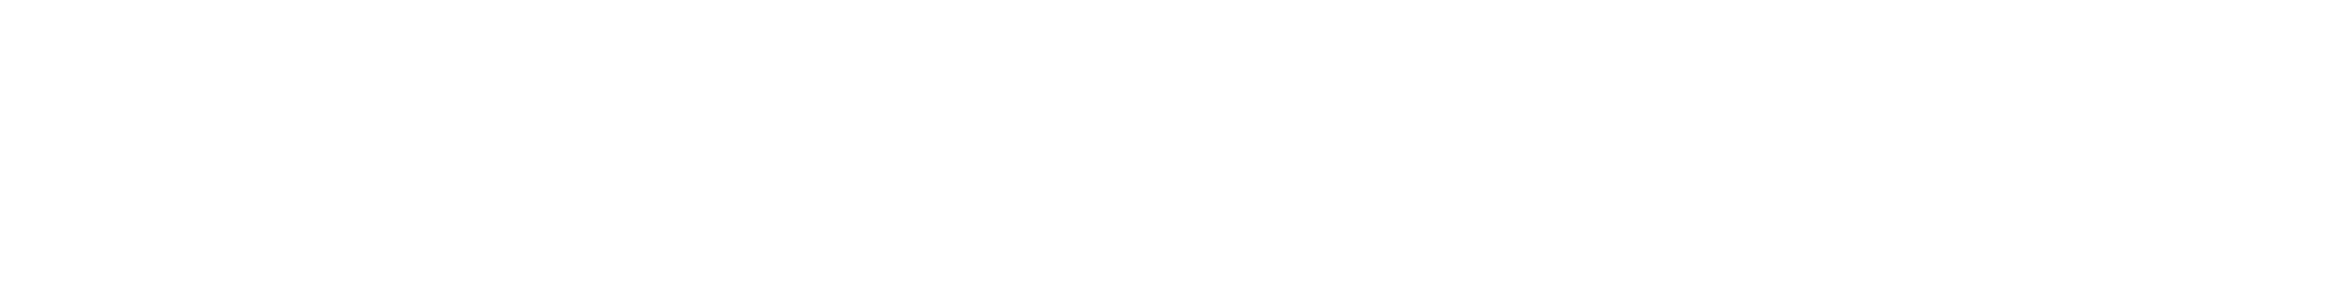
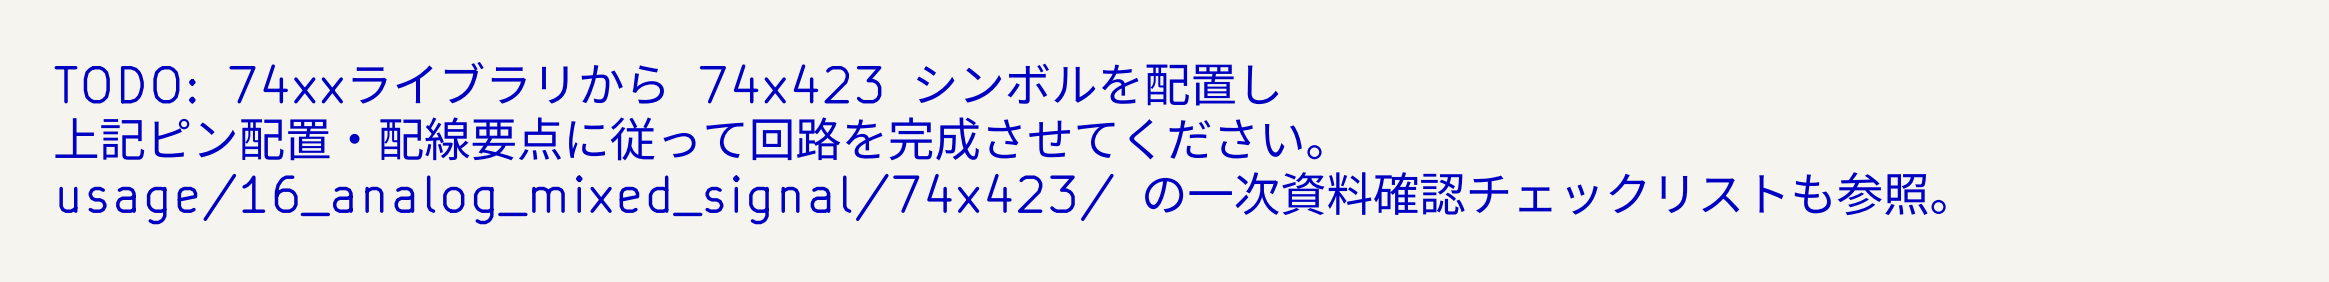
text: none -> TODO: 74xxライブラリから 74x423 シンボルを配置し (667, 83)
text: none -> 上記ピン配置・配線要点に従って回路を完成させてください。 (688, 138)
text: none -> usage/16_analog_mixed_signal/74x423/ の一次資料確認チェックリストも参照。 (1003, 197)

